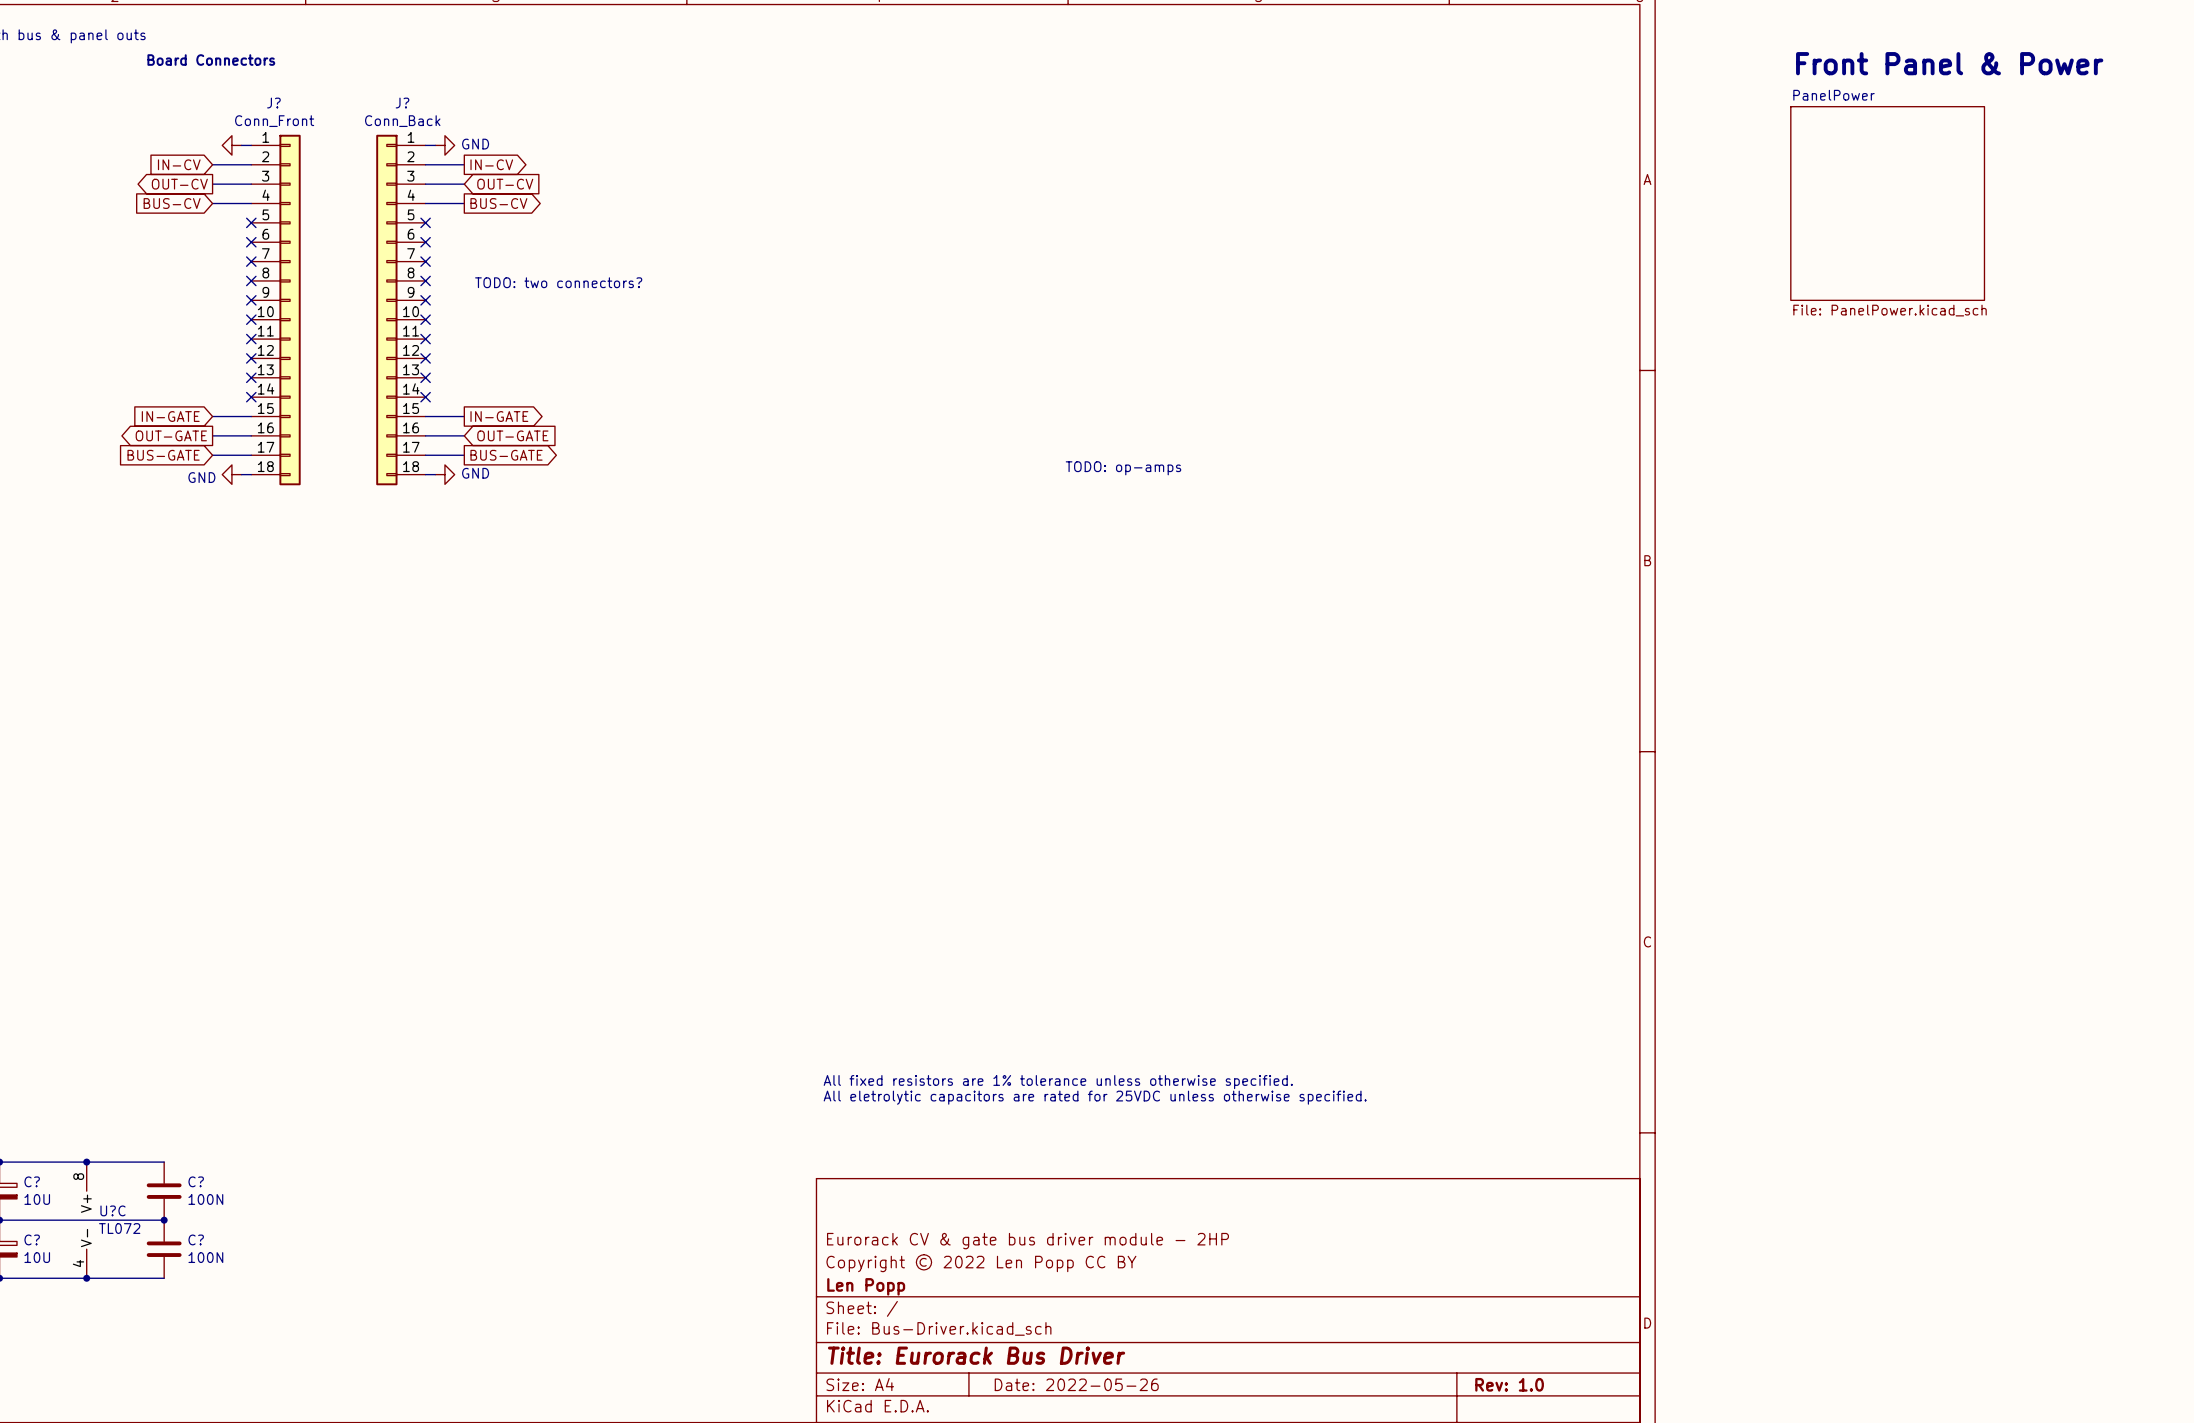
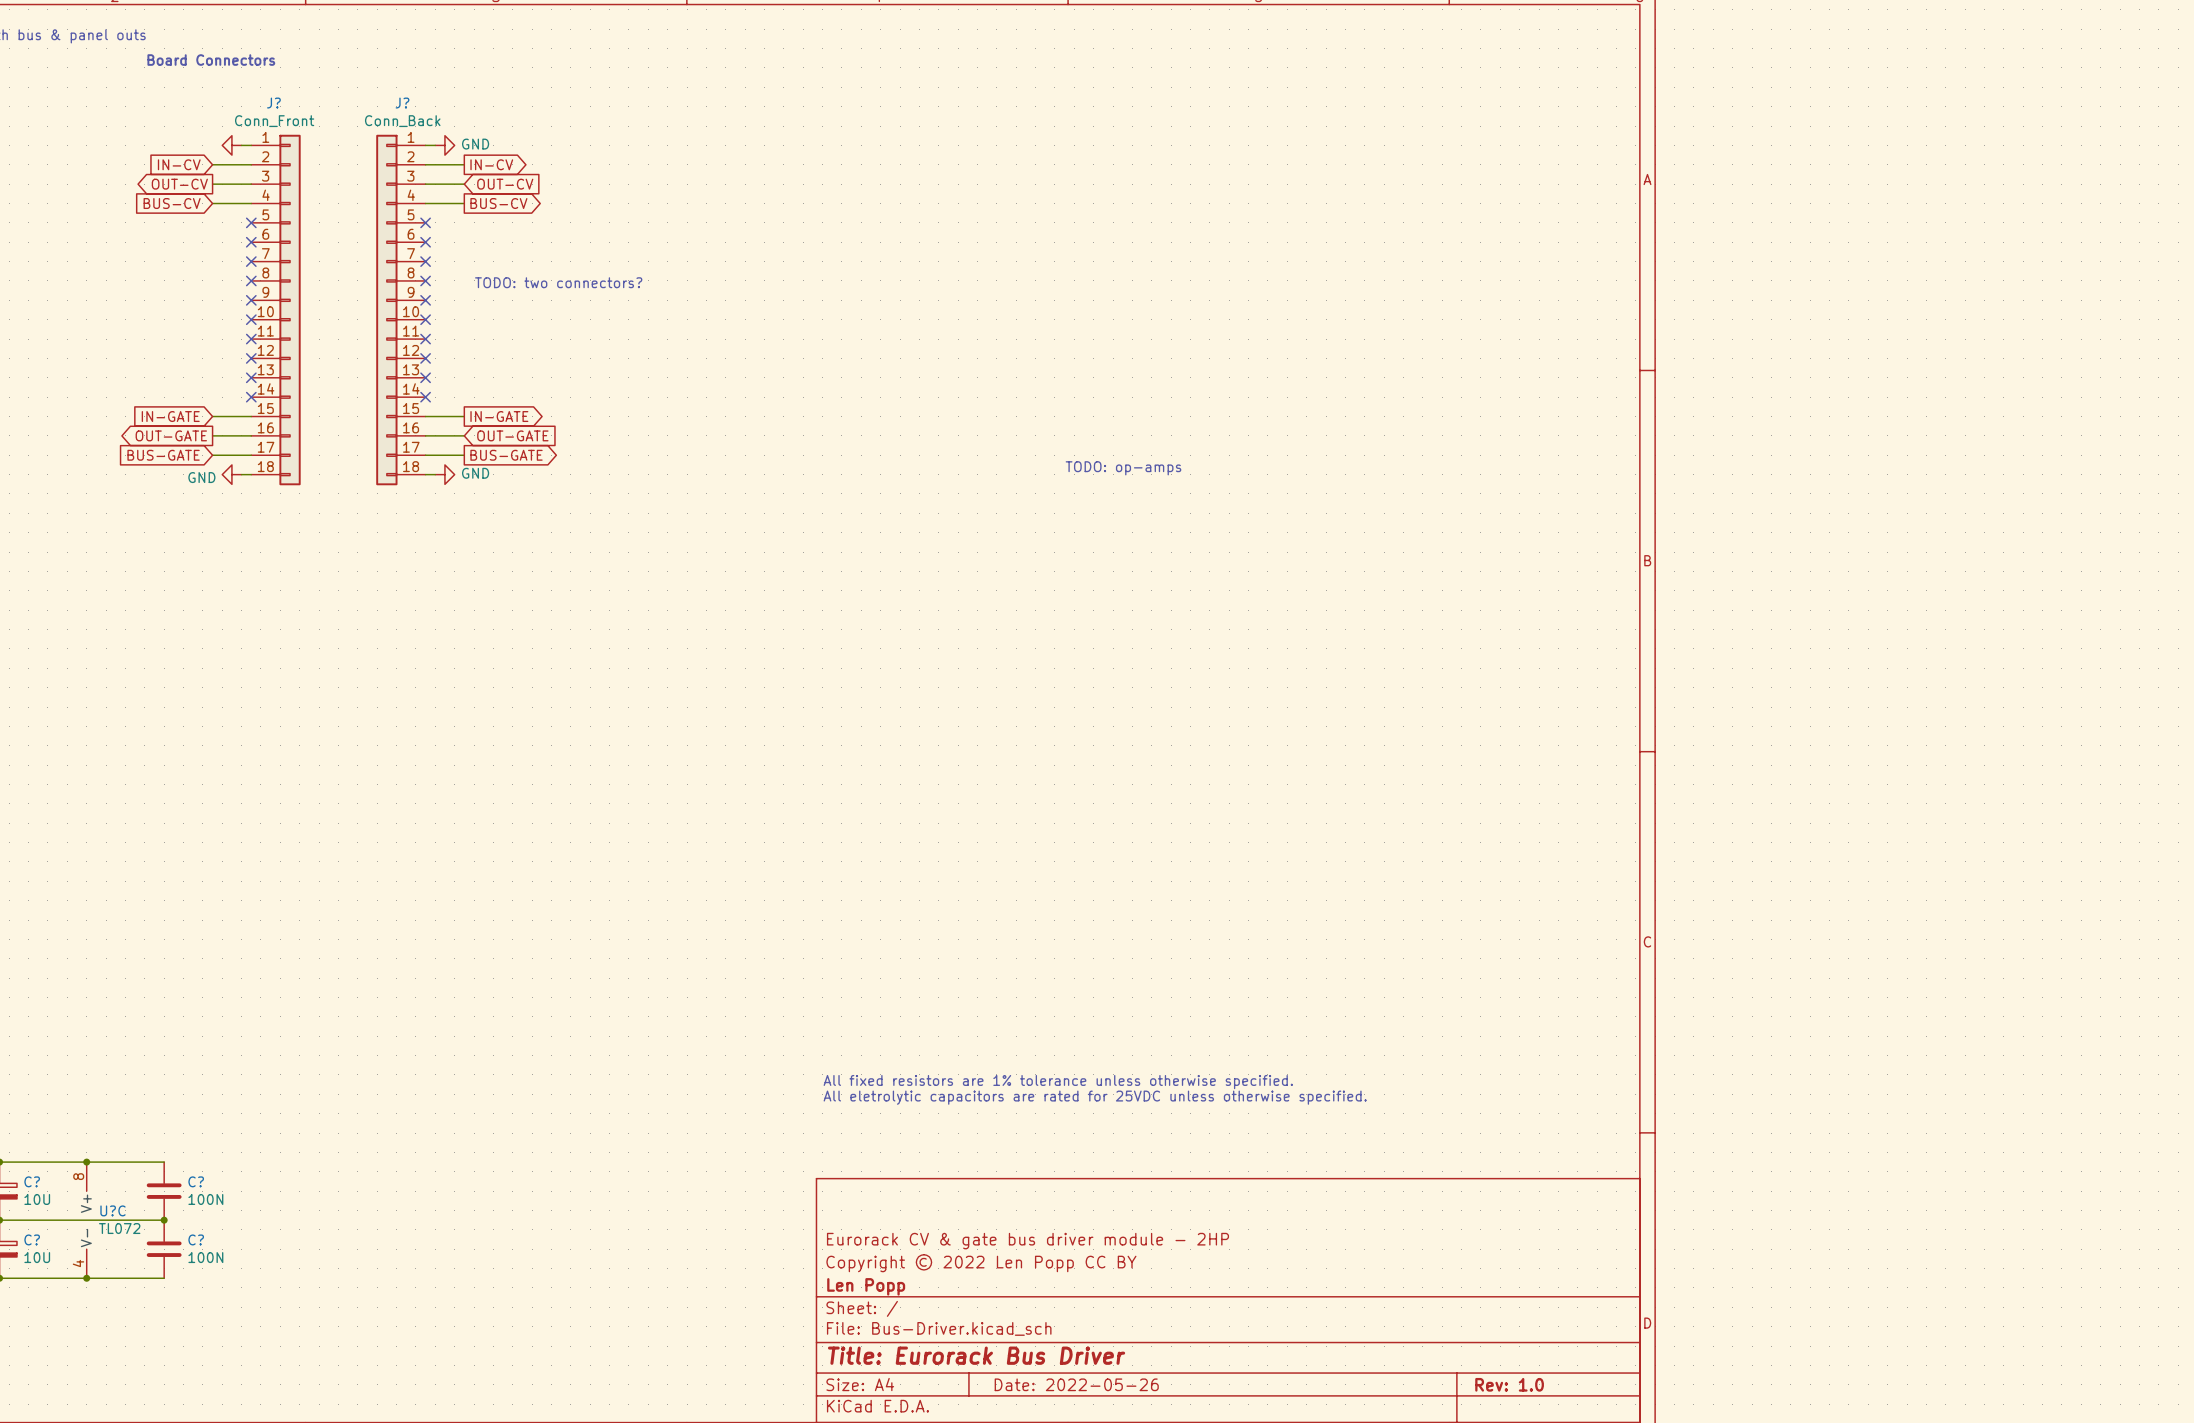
text: Front Panel & Power (1949, 63) -> none
sheet PanelPower: File: PanelPower.kicad_sch (1887, 203) -> none

